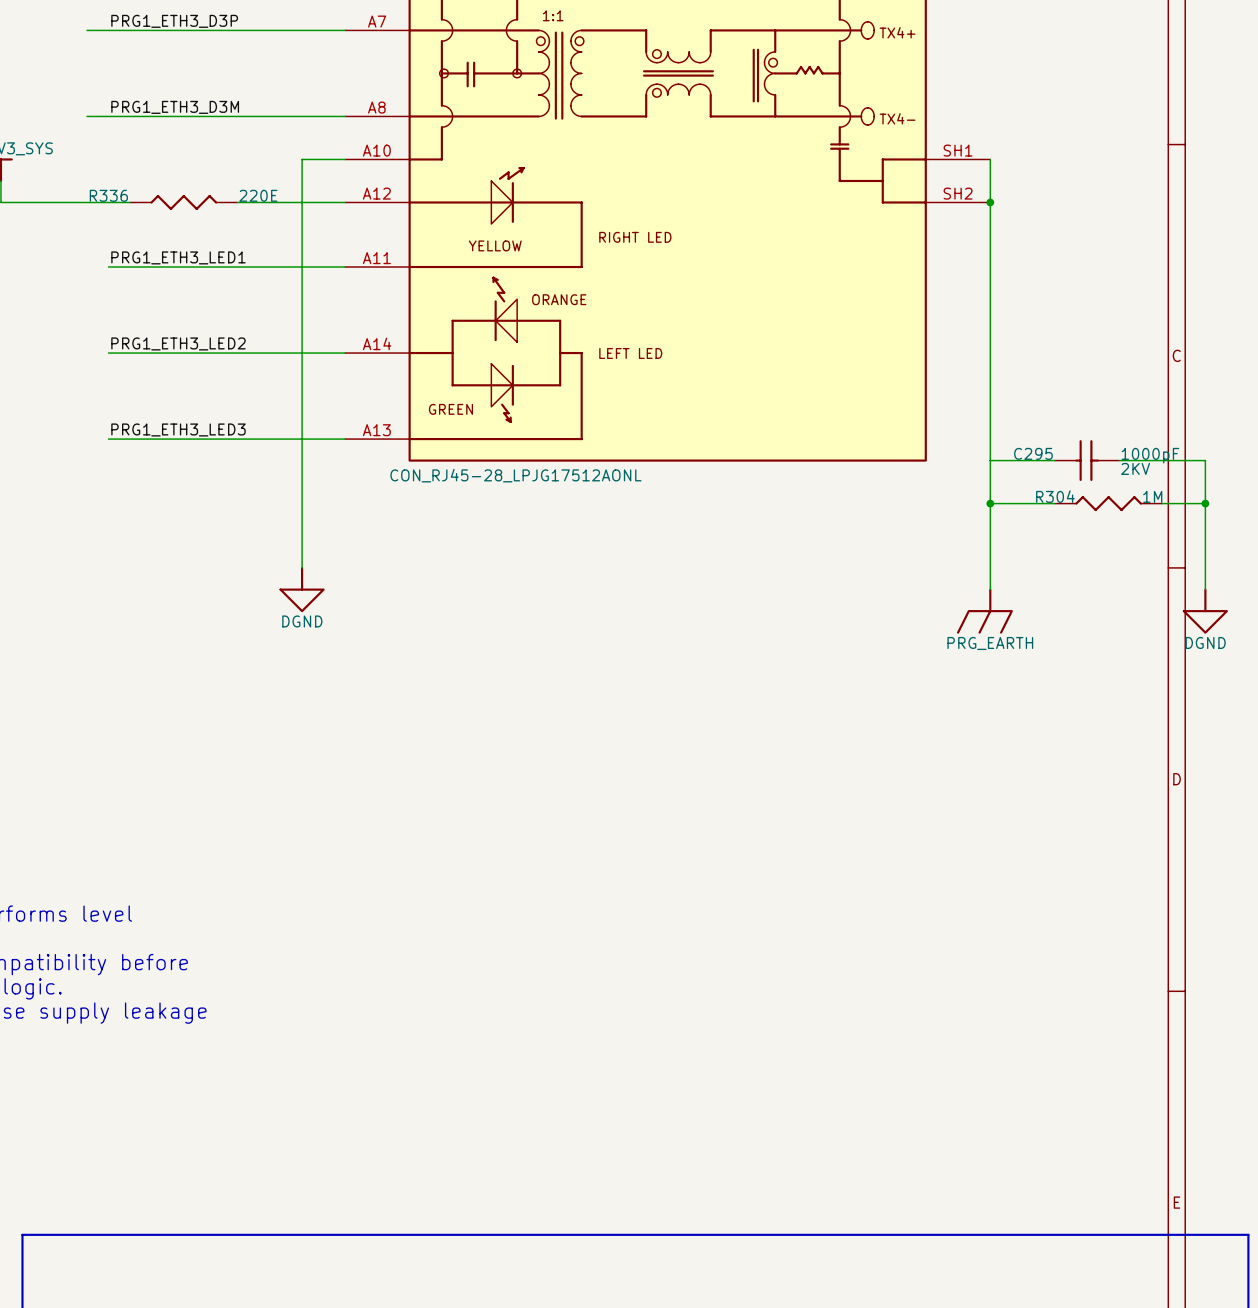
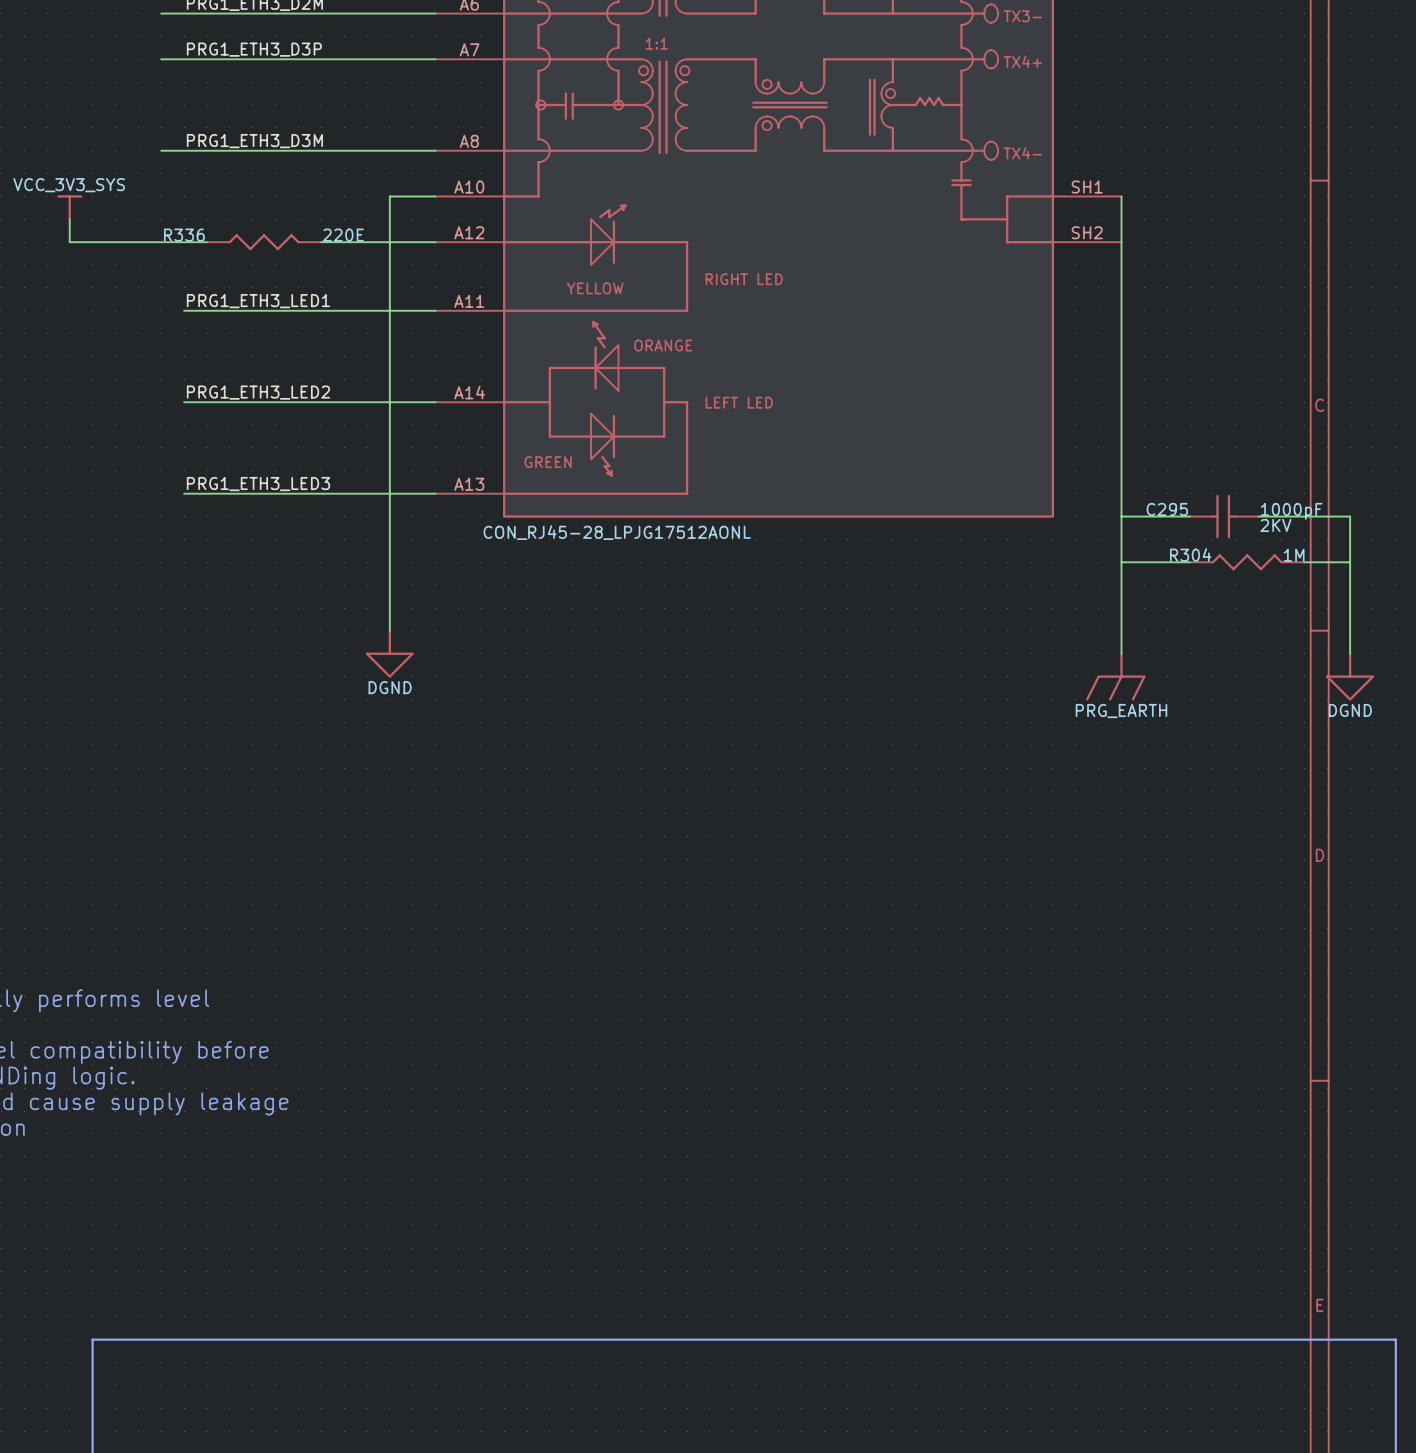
junction: (990, 202) -> none
junction: (990, 503) -> none
junction: (1205, 503) -> none

